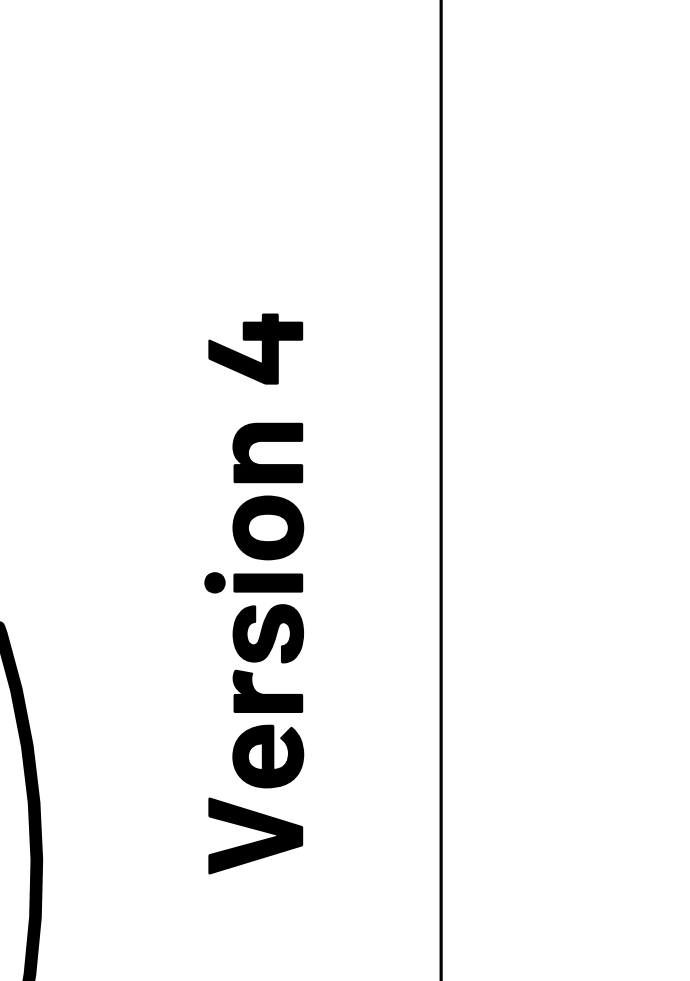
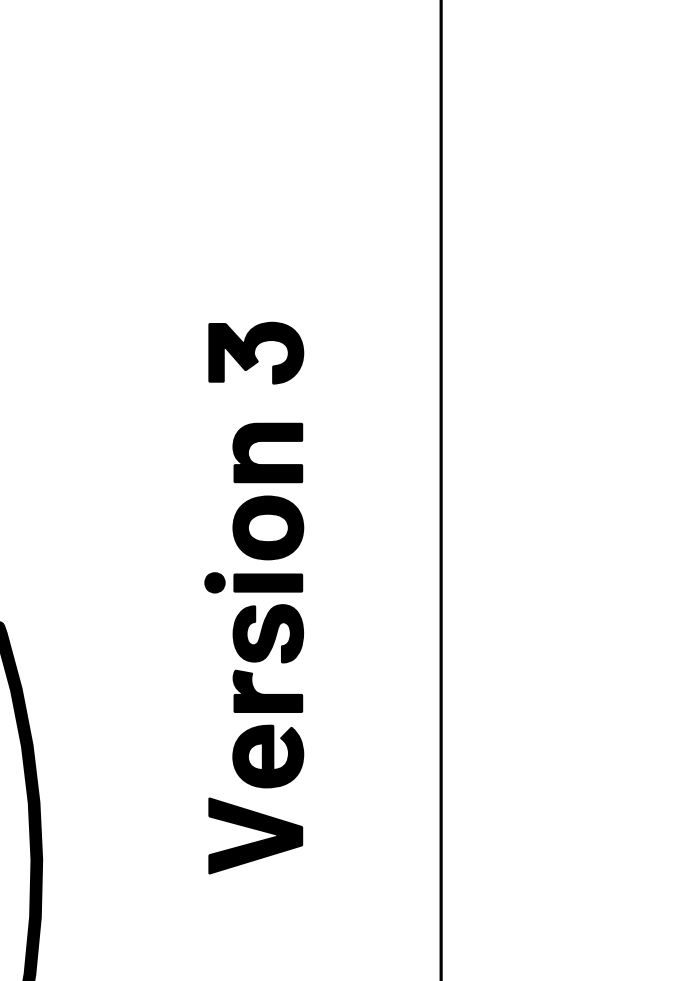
text: Version 4 (254, 594) -> Version 3 (254, 598)

